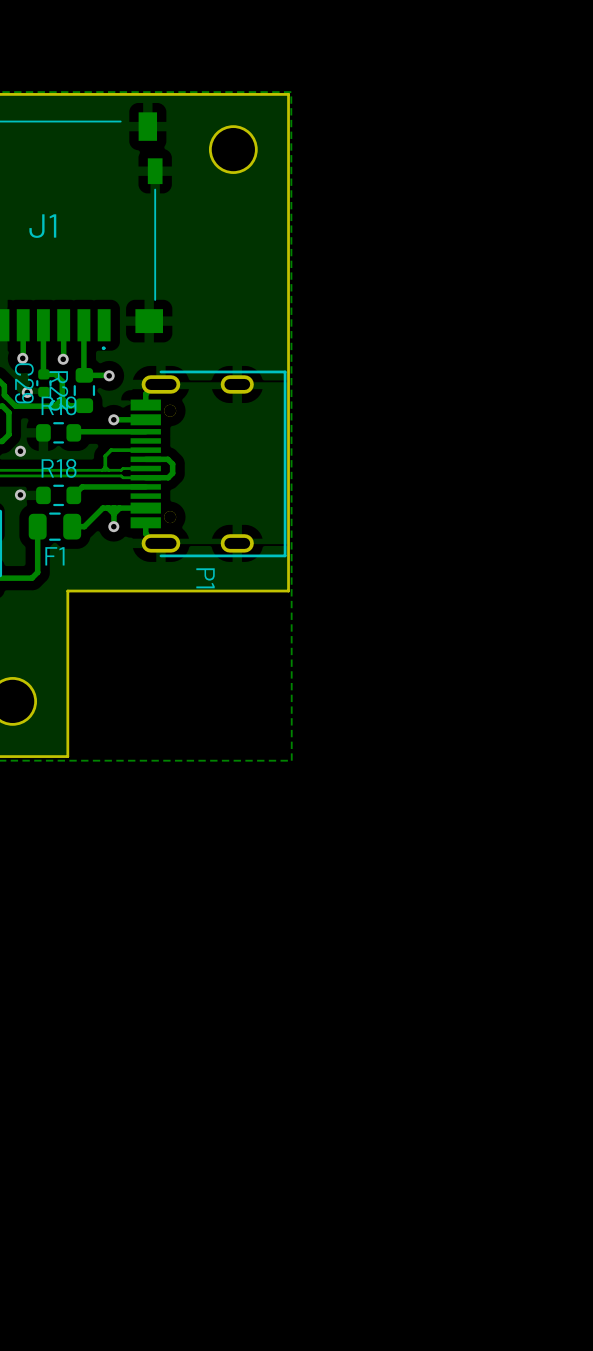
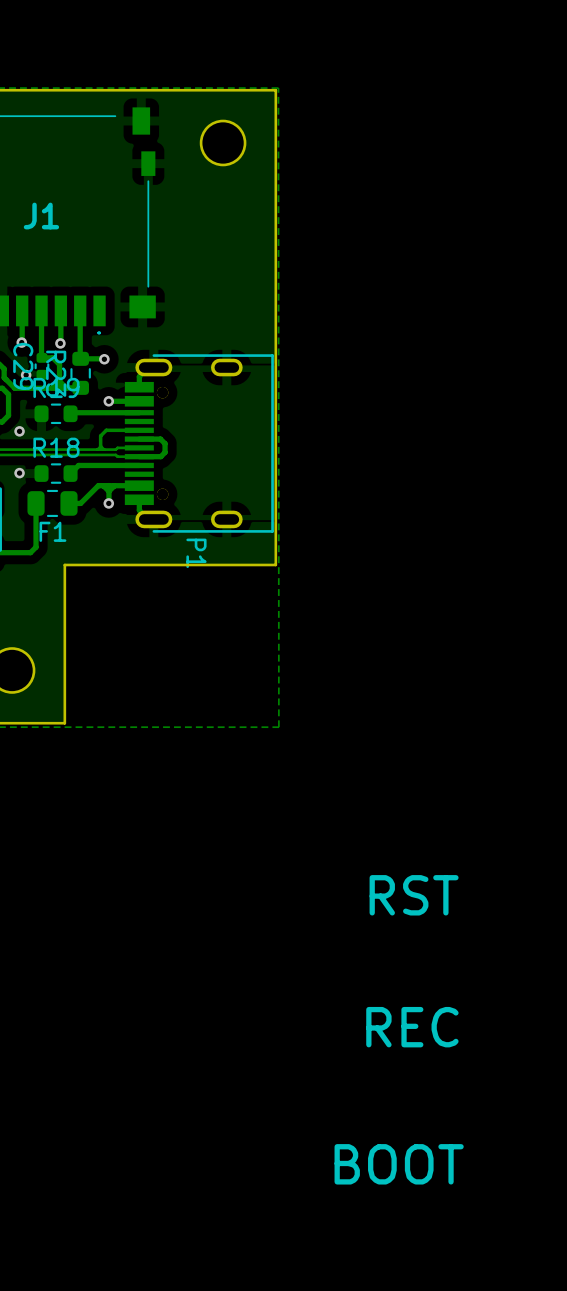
text: none -> RST (414, 895)
text: none -> REC (412, 1027)
text: none -> BOOT (399, 1164)

